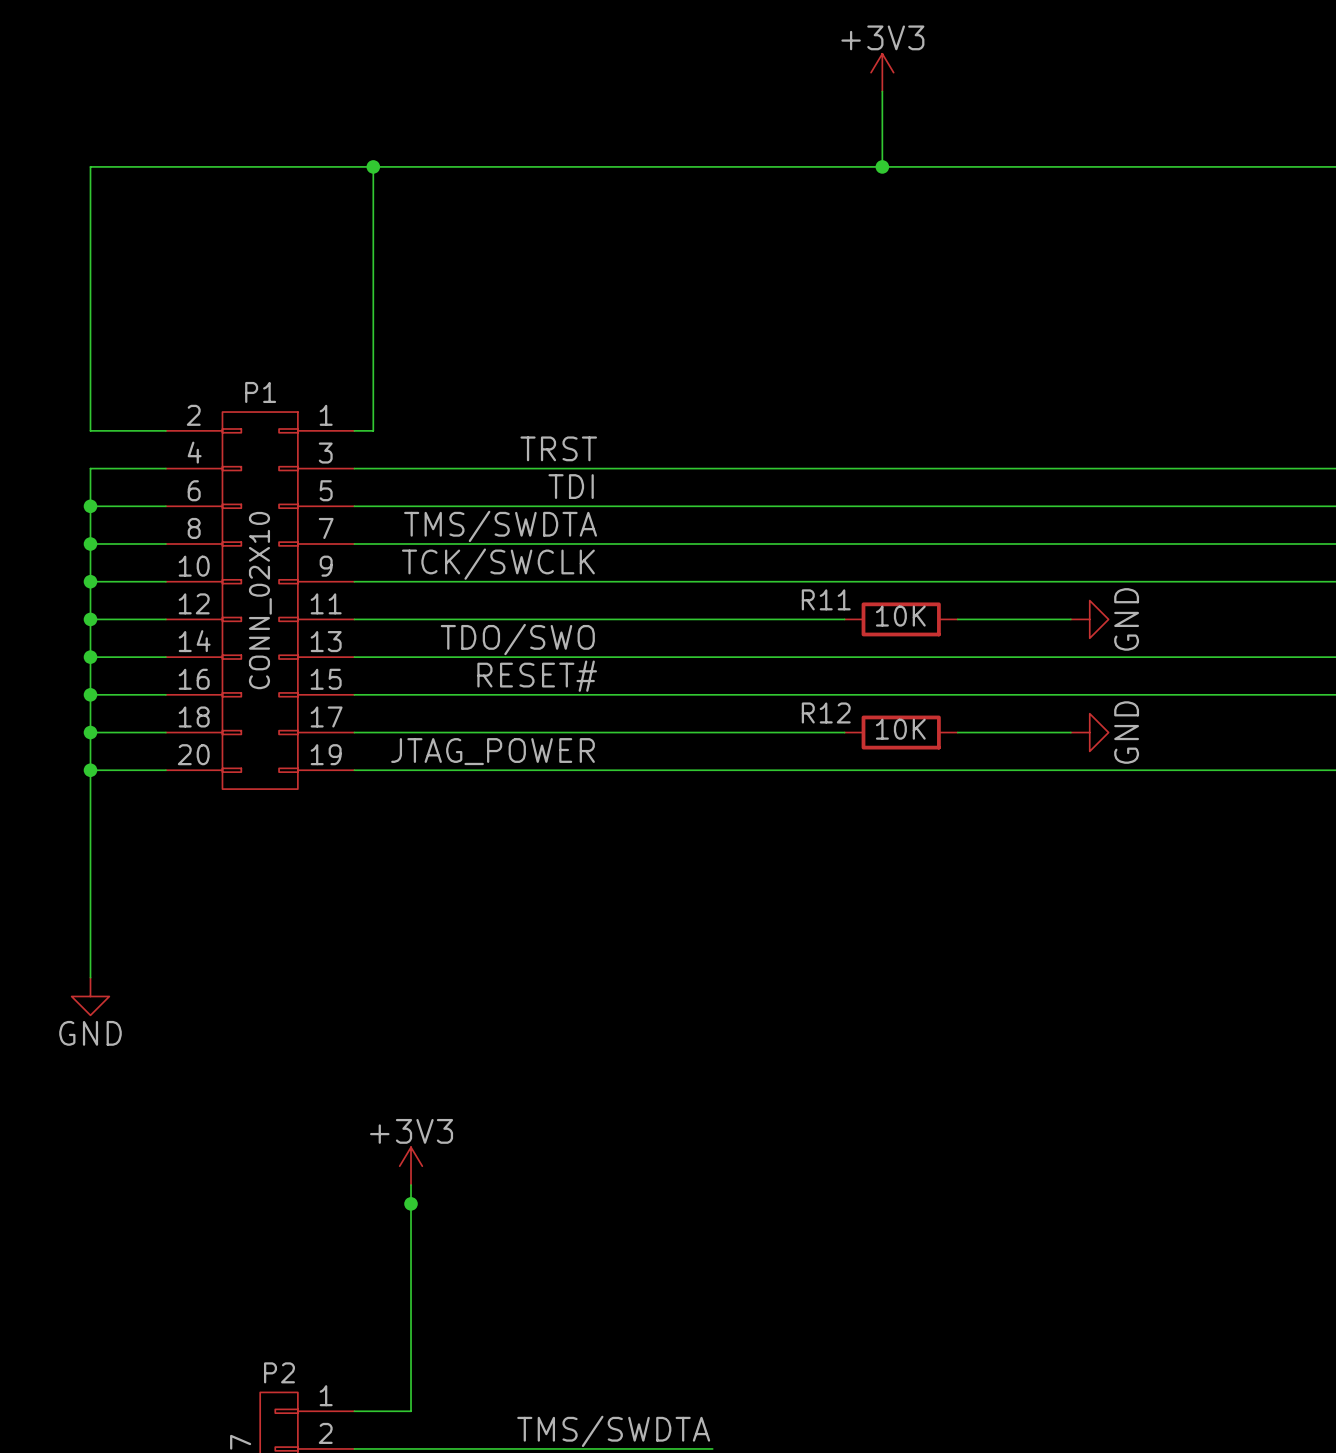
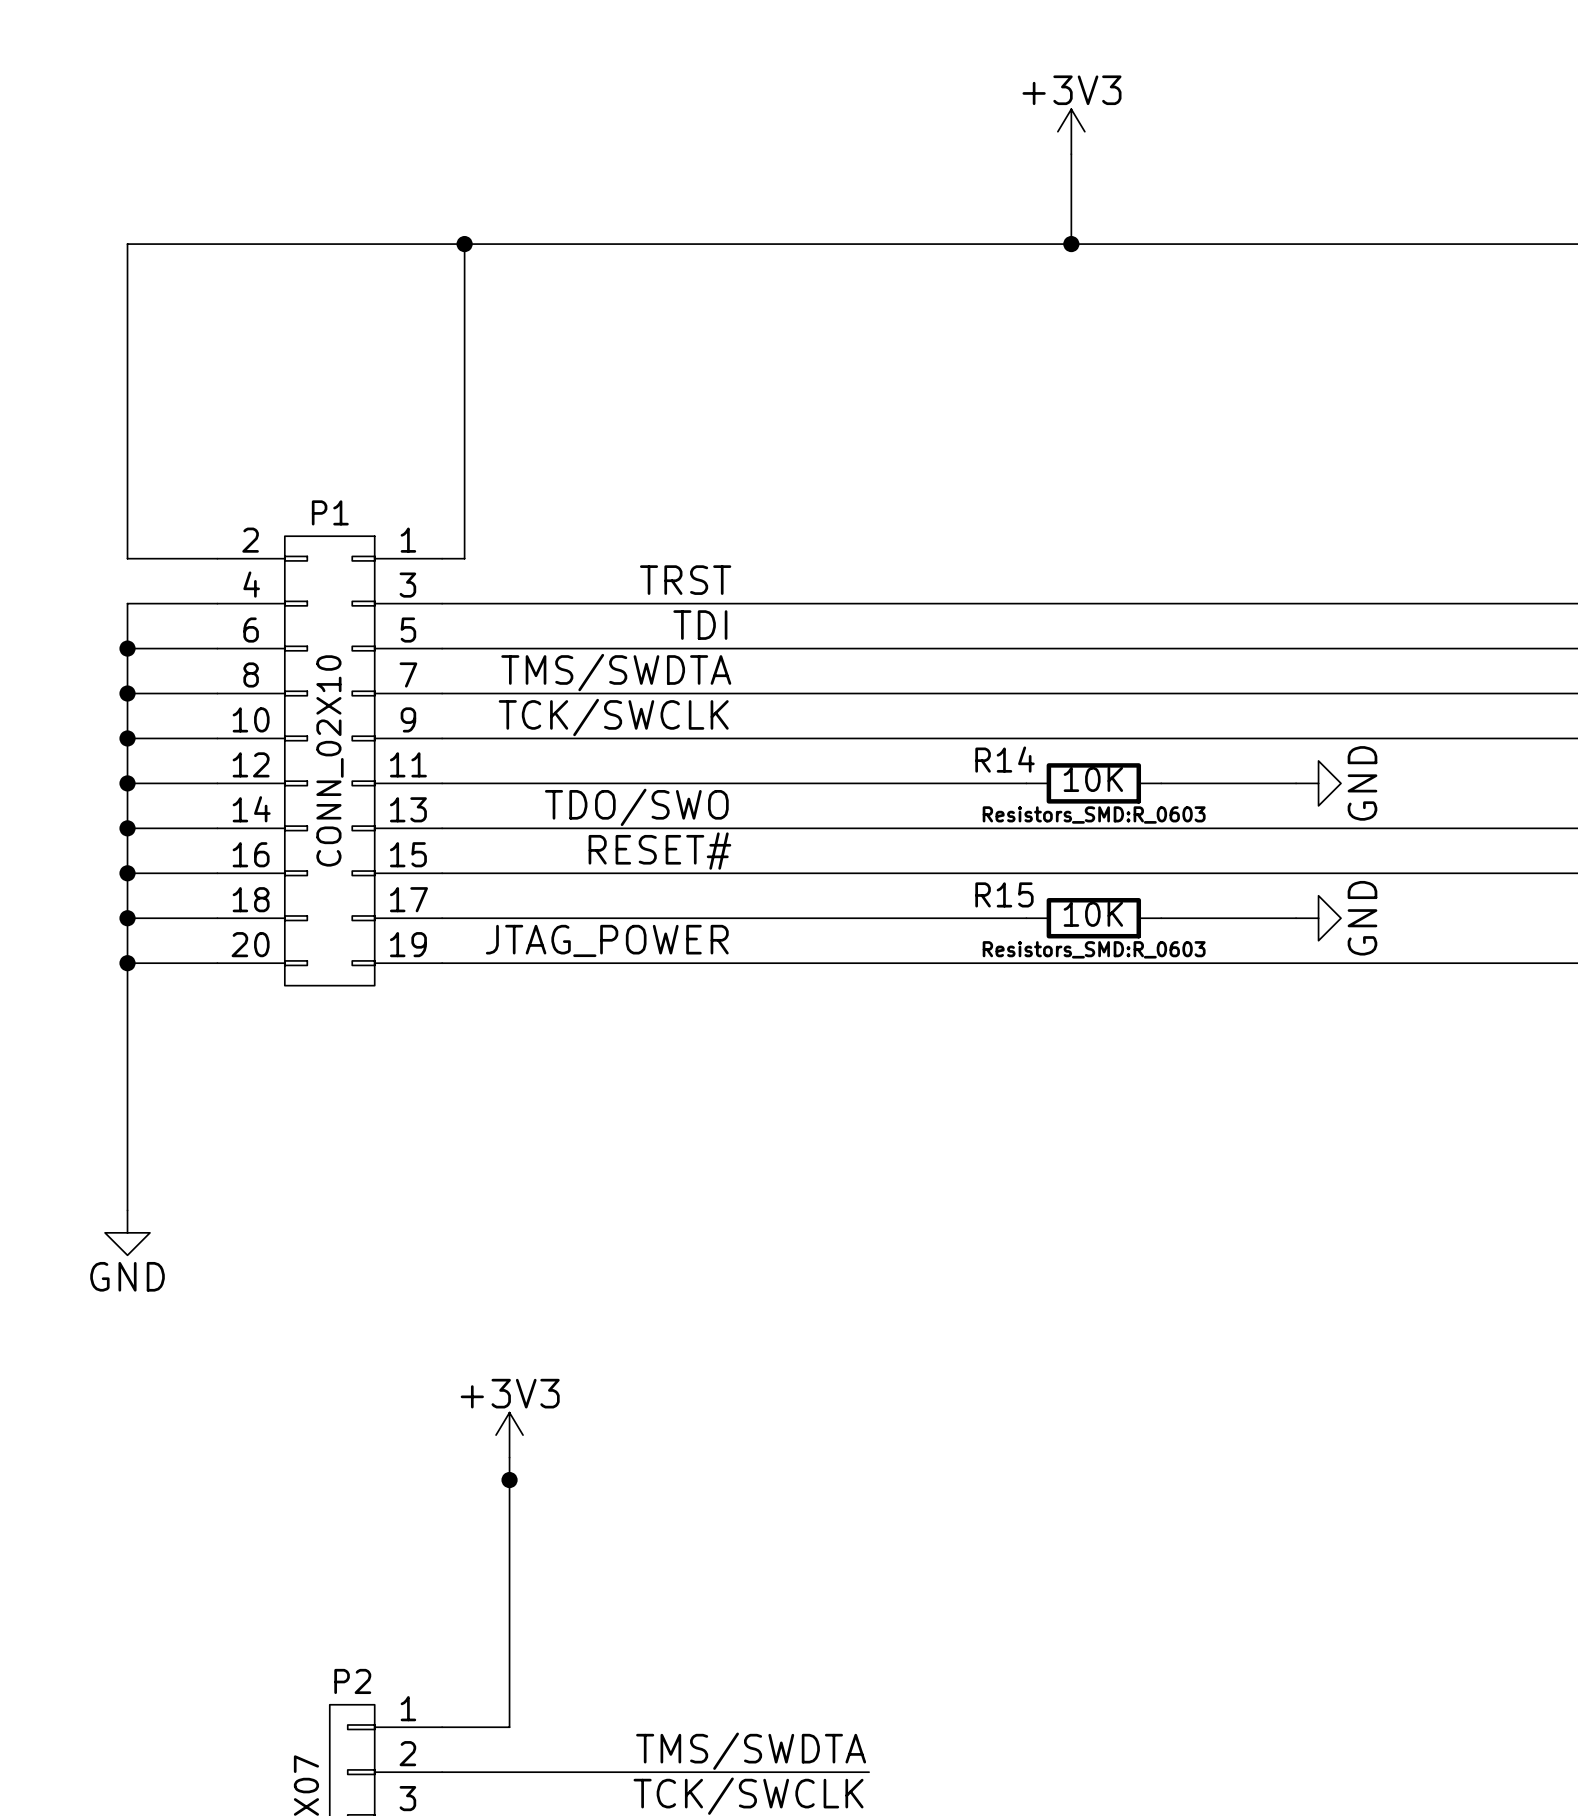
R11 name: R11 (826, 599) -> R14 (1005, 759)
R11 text: none -> Resistors_SMD:R_0603 (1094, 815)
R12 name: R12 (826, 712) -> R15 (1004, 894)
R12 text: none -> Resistors_SMD:R_0603 (1094, 949)

